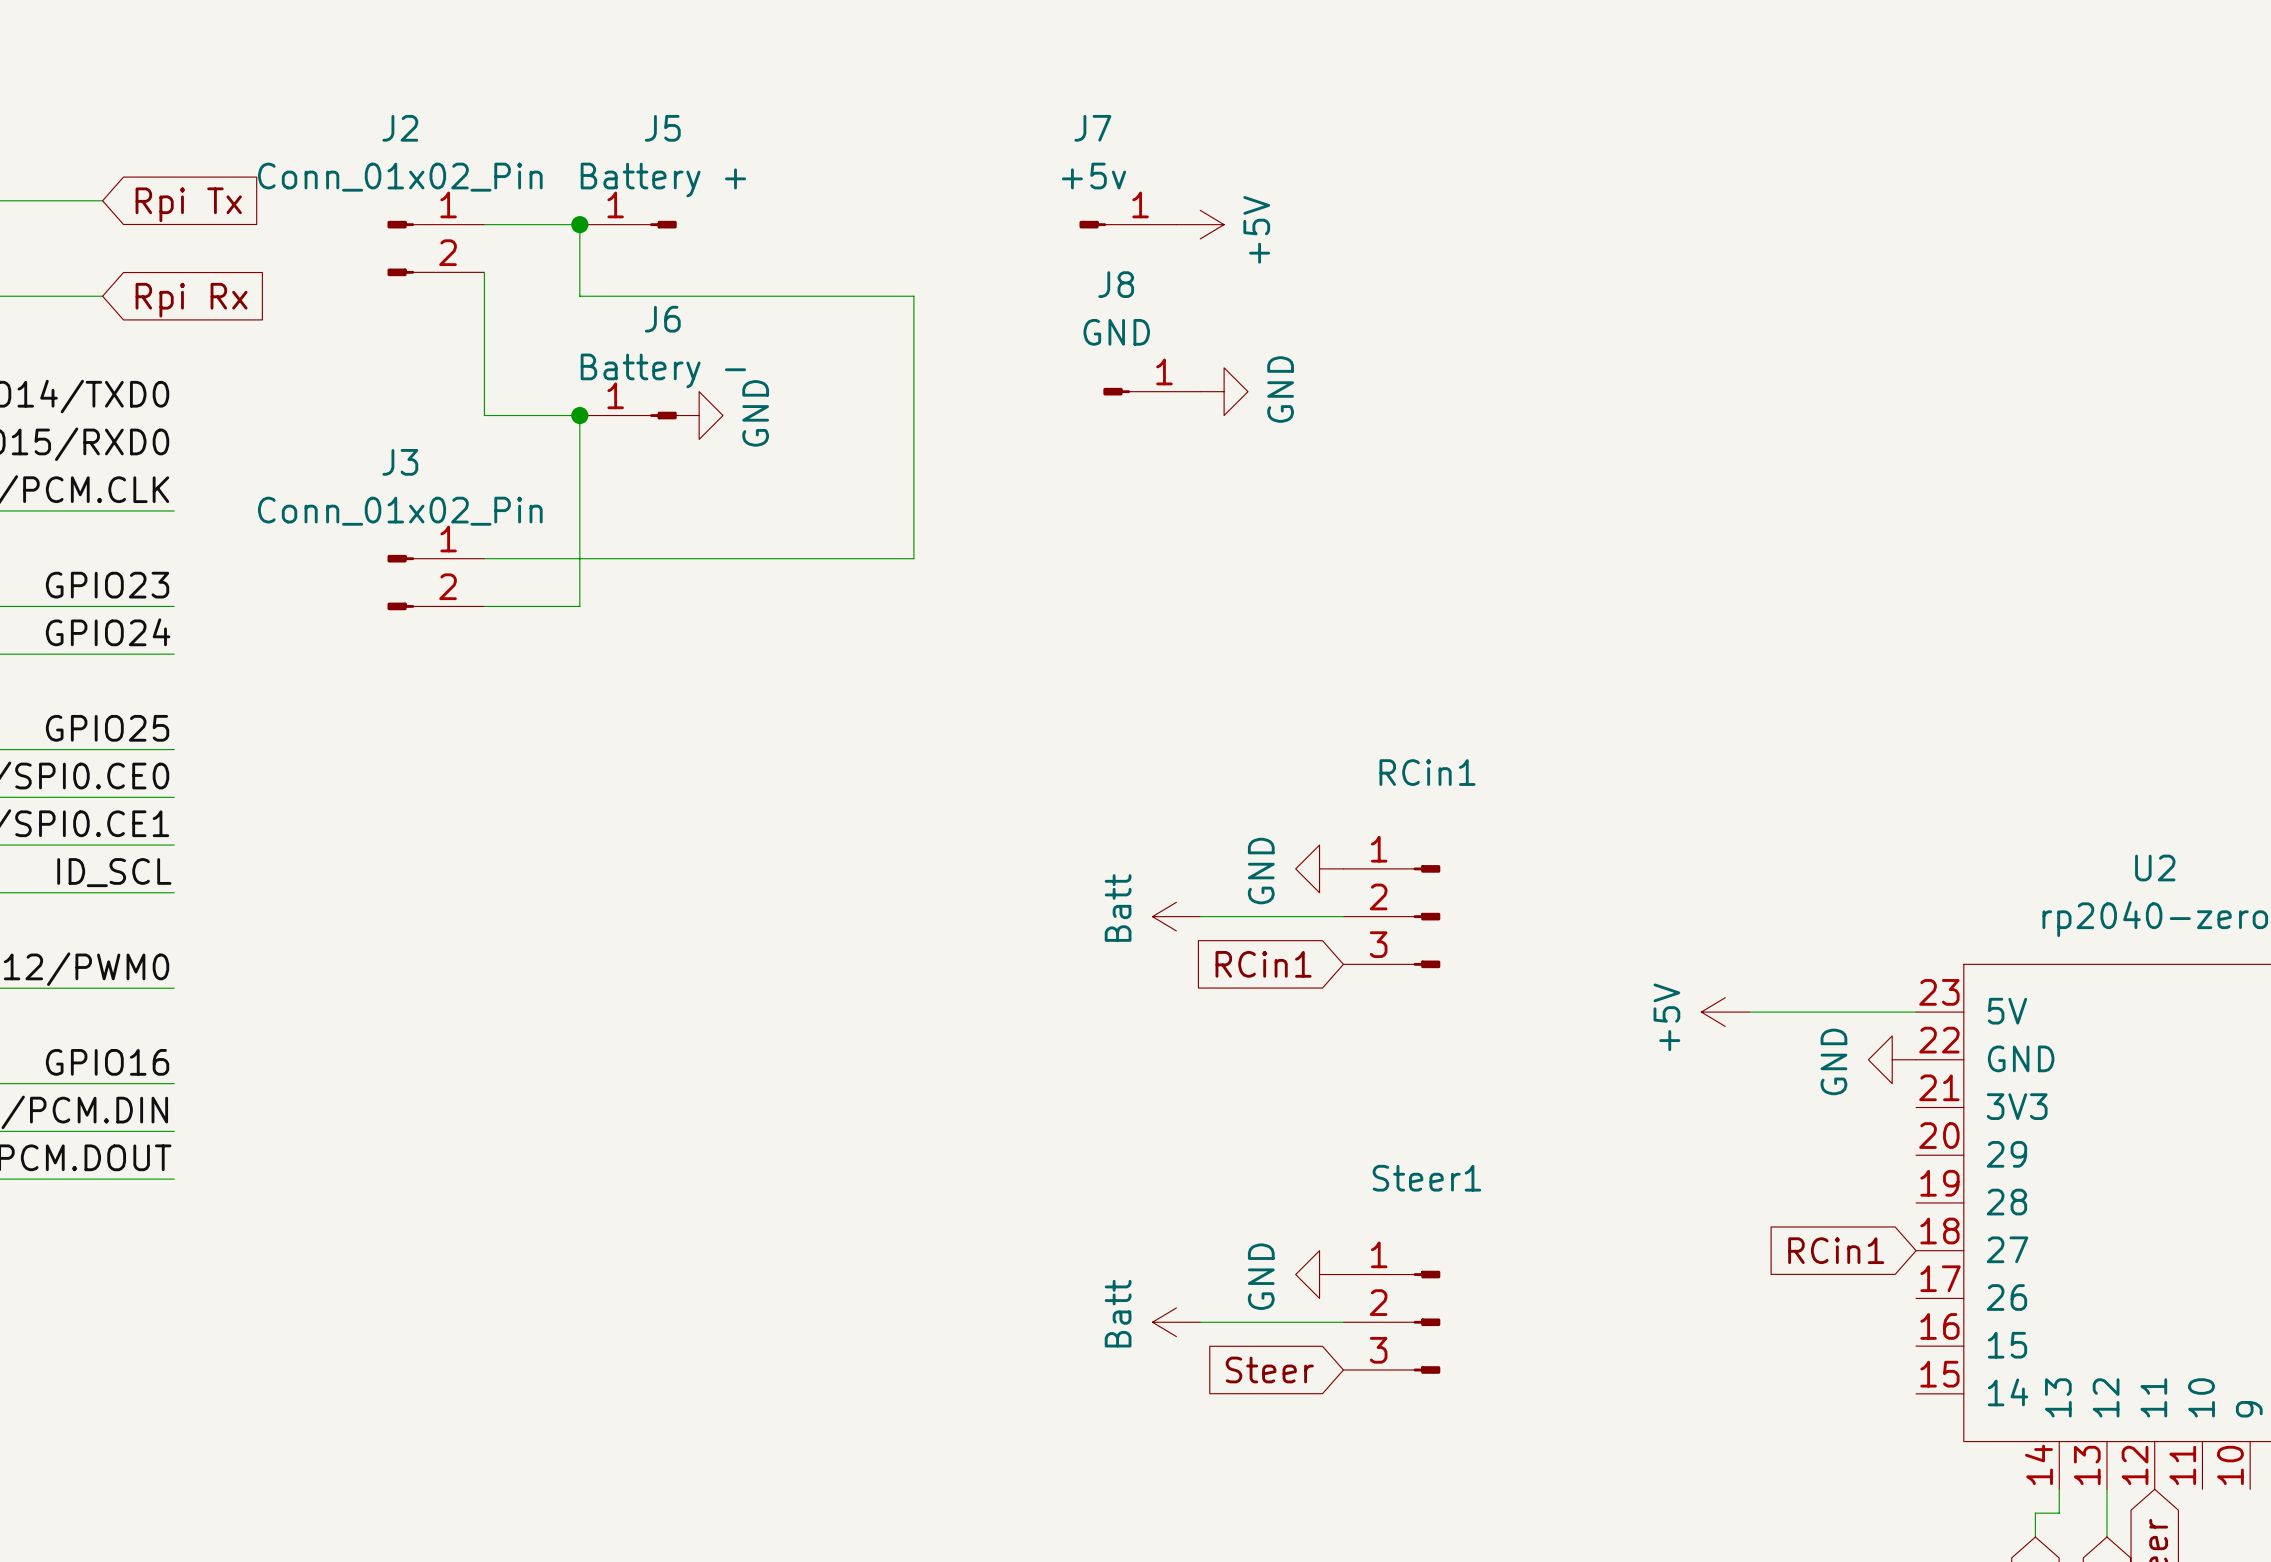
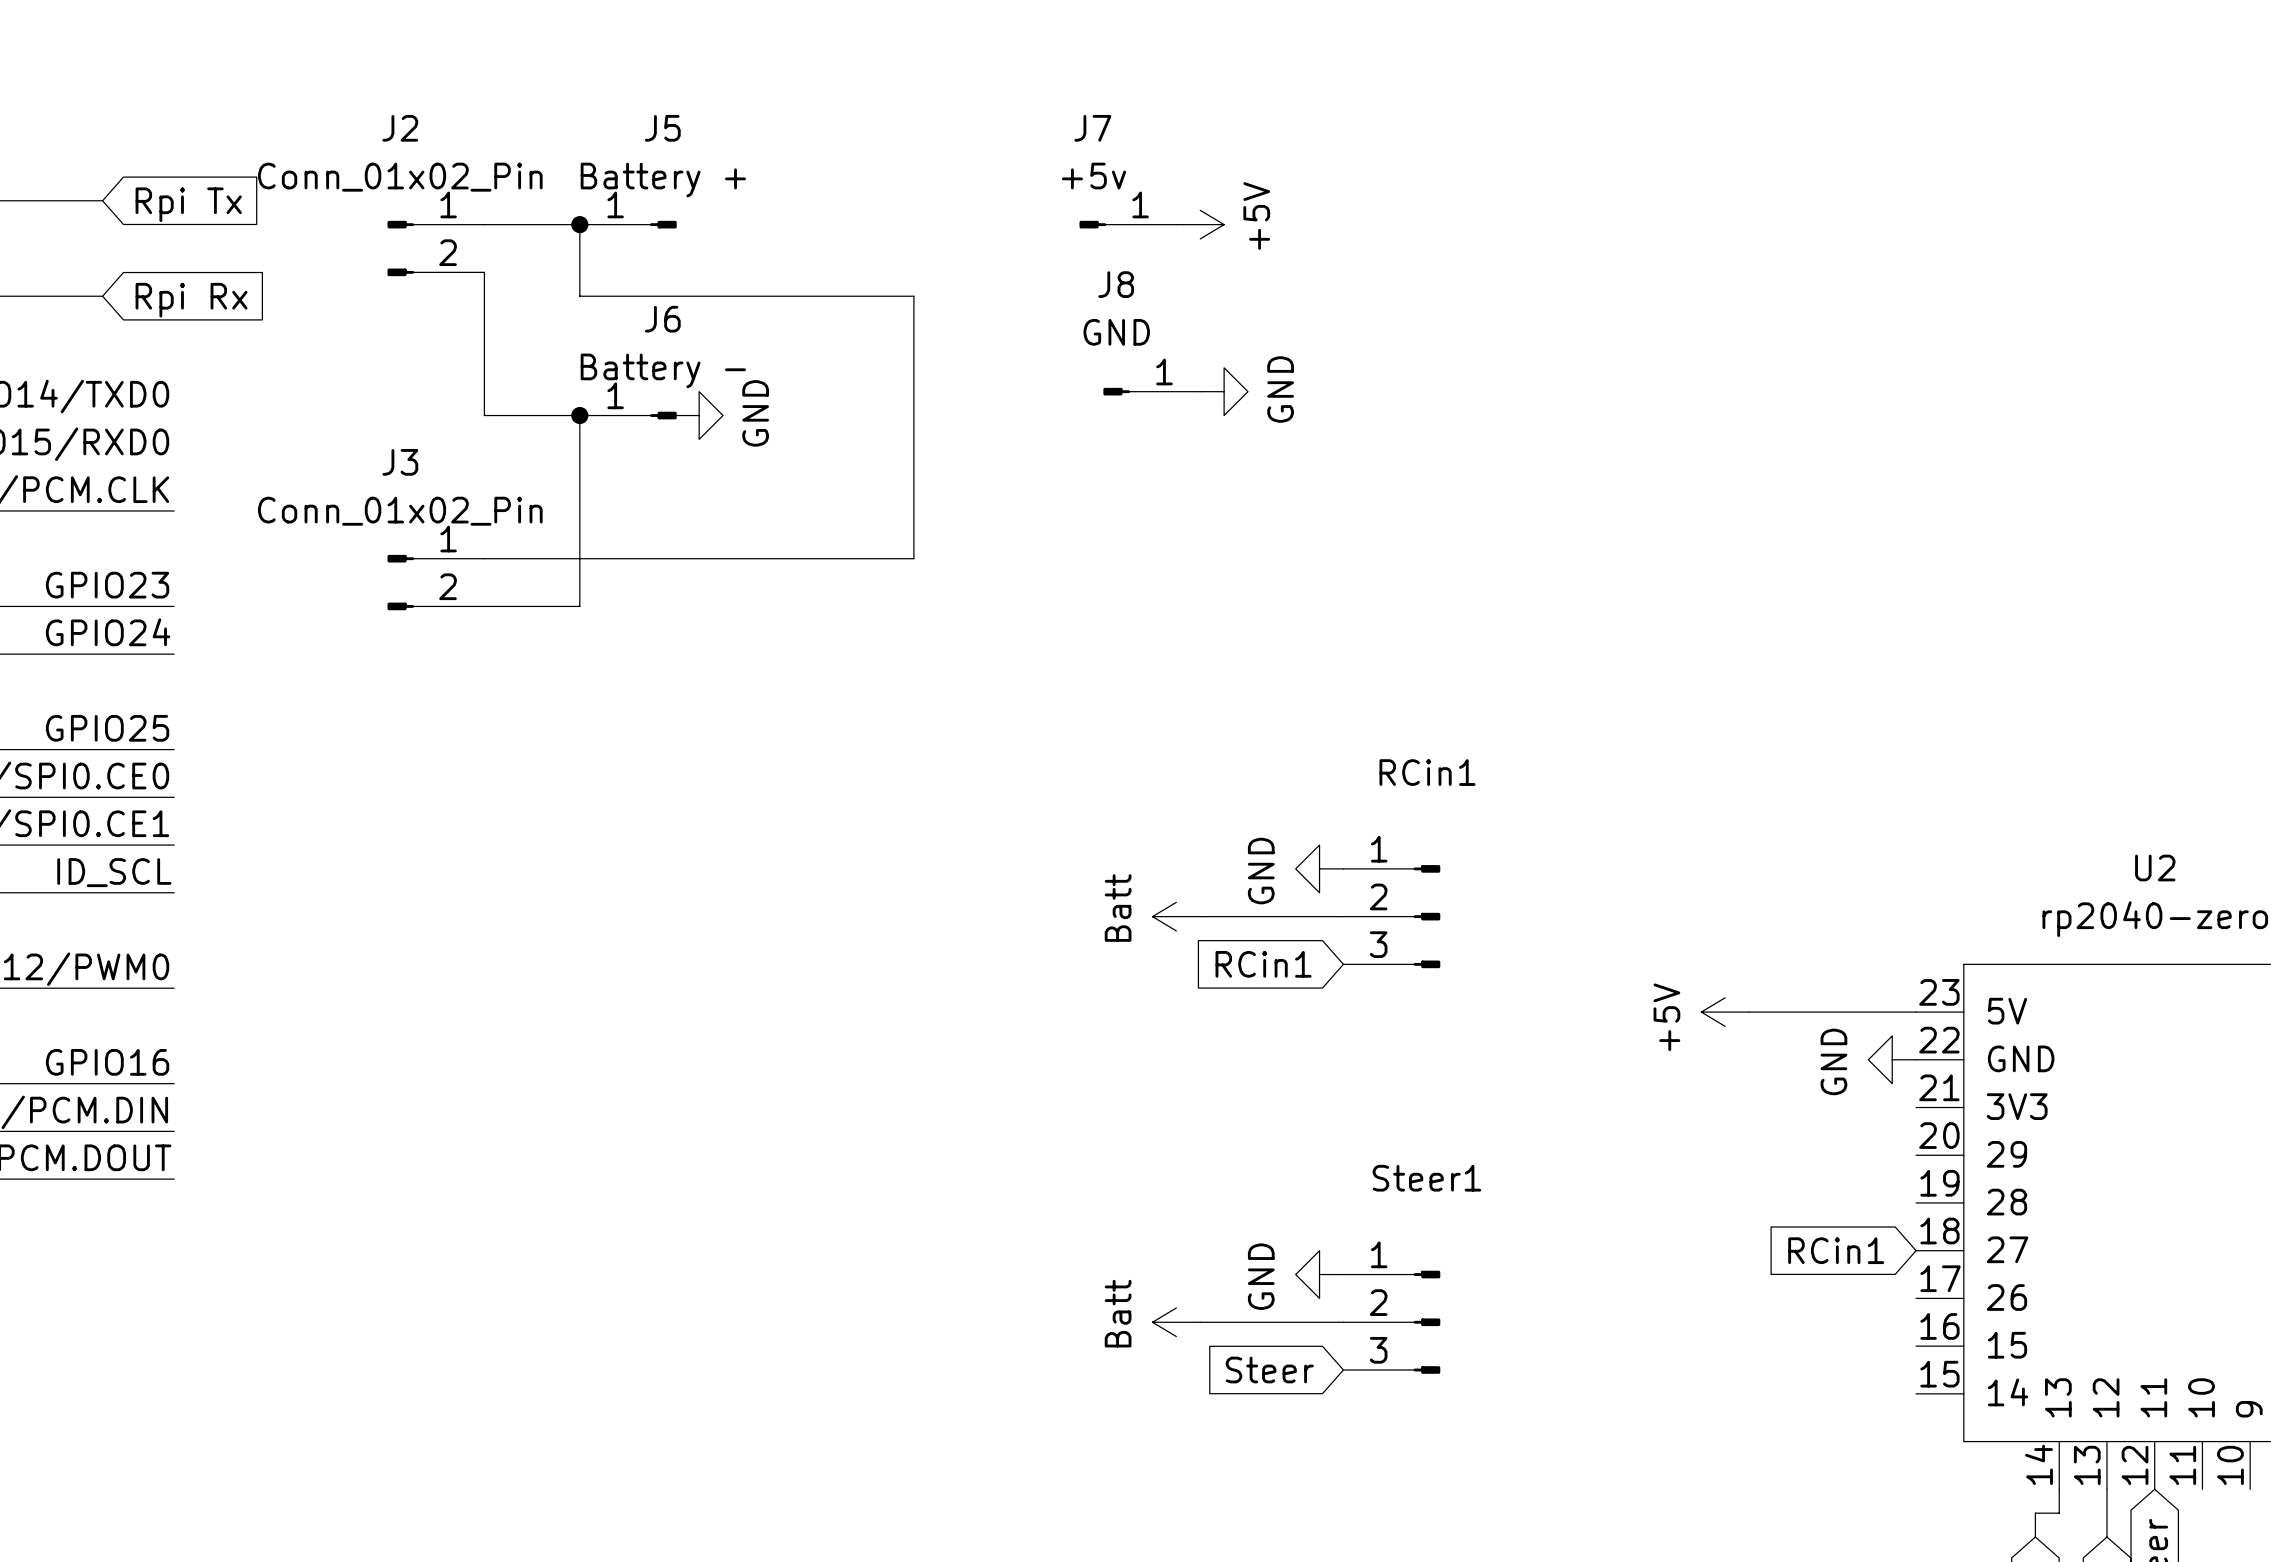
power symbol text position: +5V (1256, 229) -> +5V (1256, 216)

